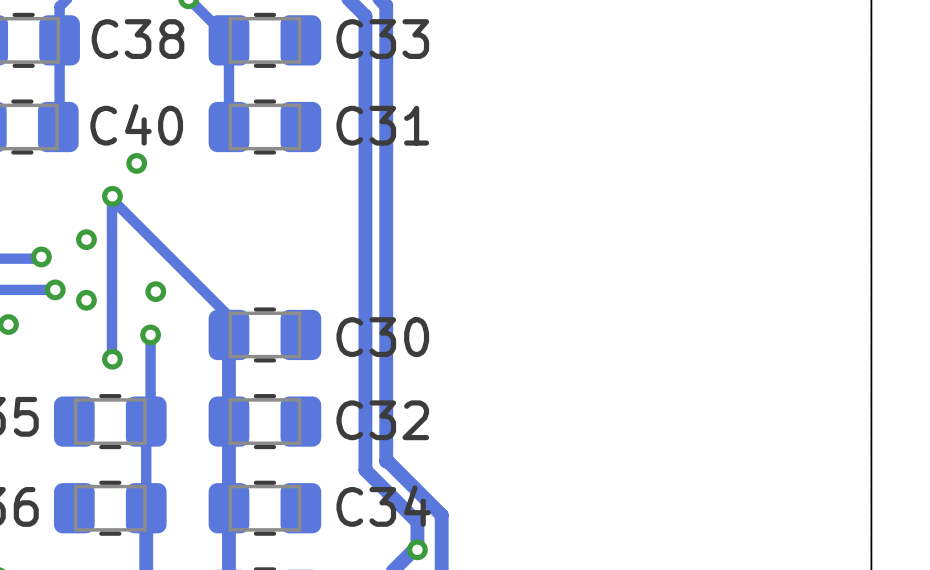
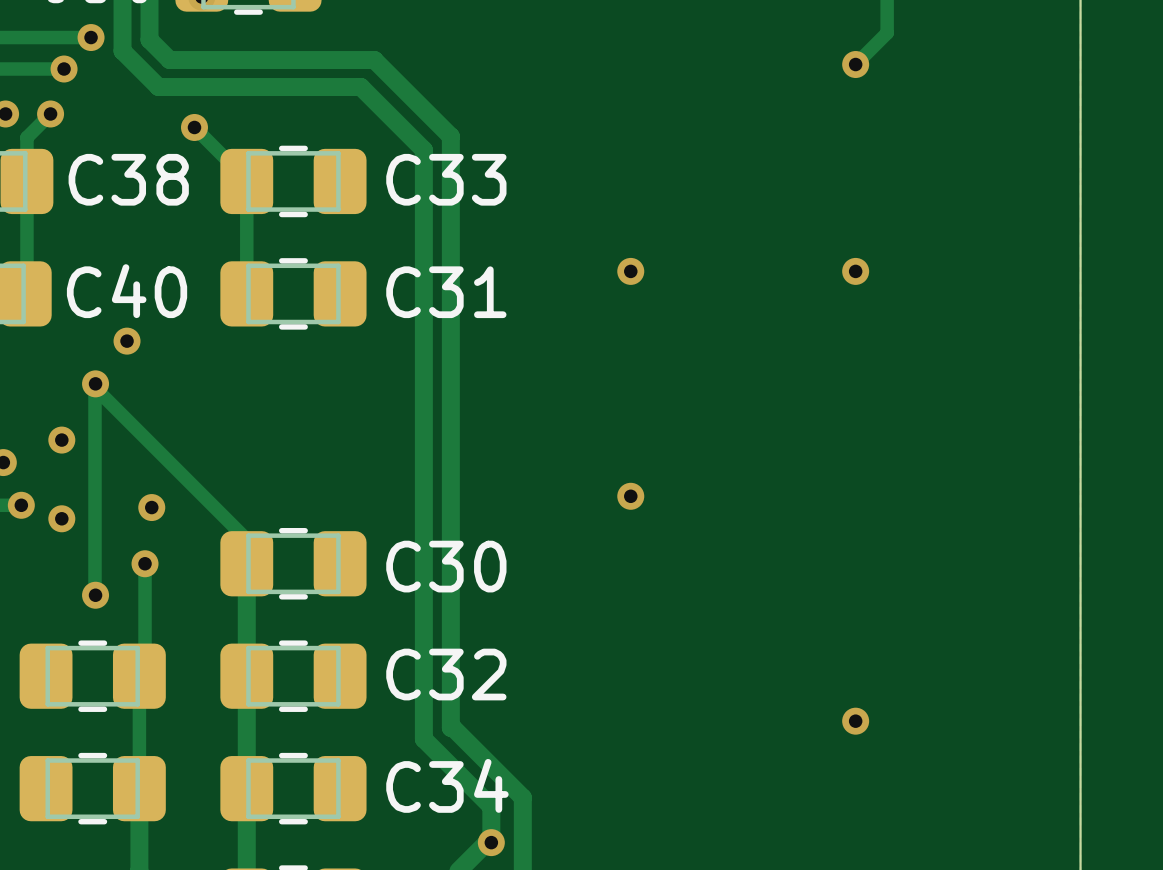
via: none -> (630, 271)
via: none -> (855, 271)
via: none -> (630, 496)
via: none -> (855, 721)

